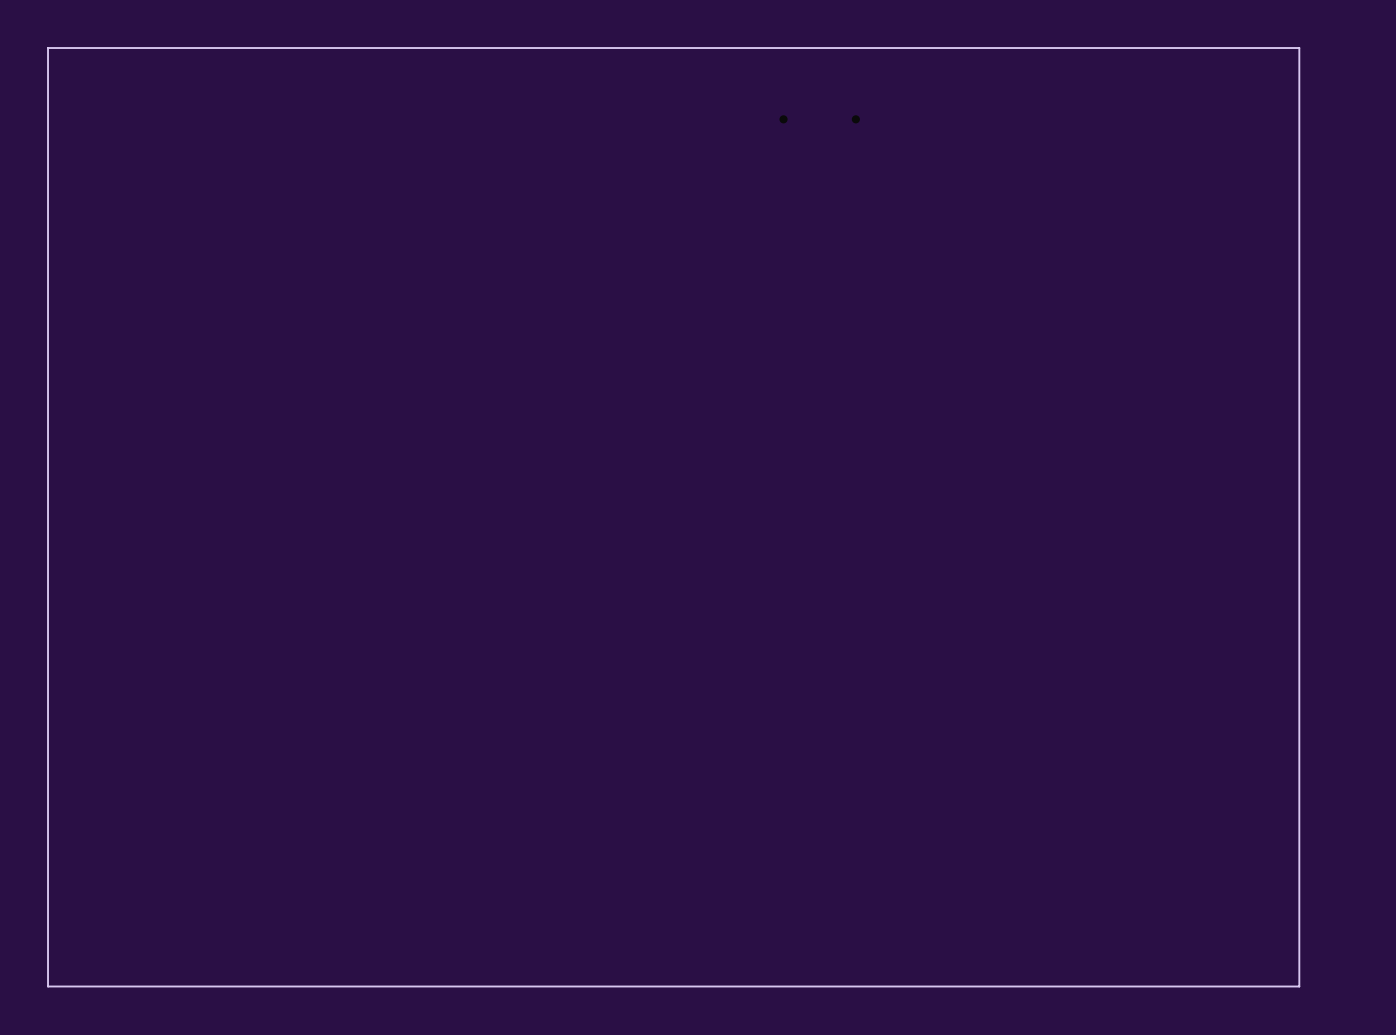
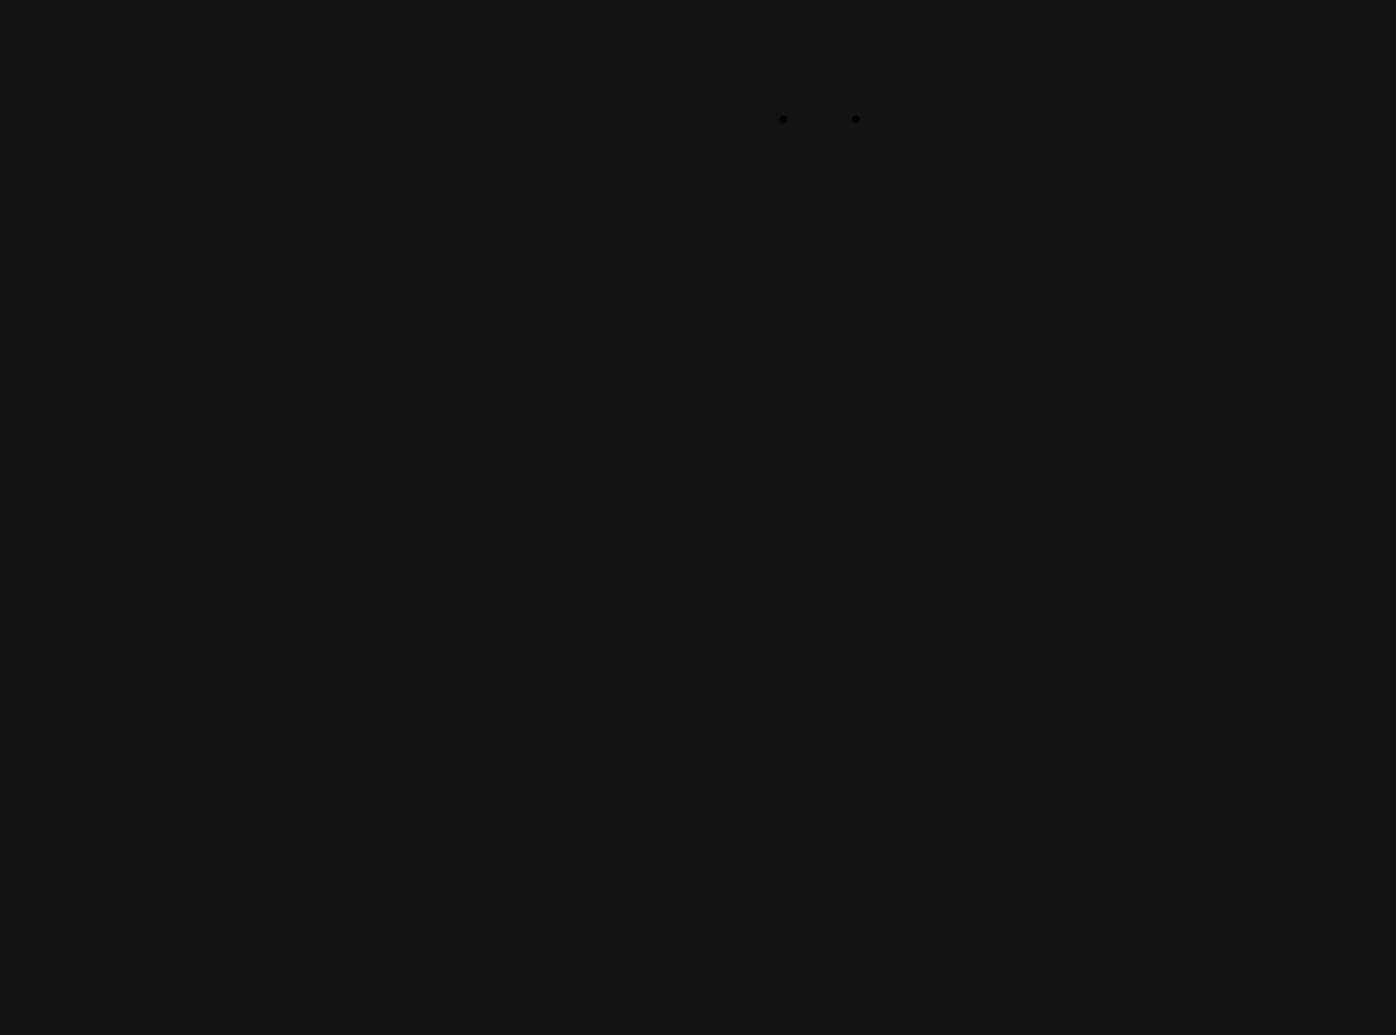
board edge: (1299, 48) (48, 48) (48, 986) (1299, 986) (1299, 48) -> none

